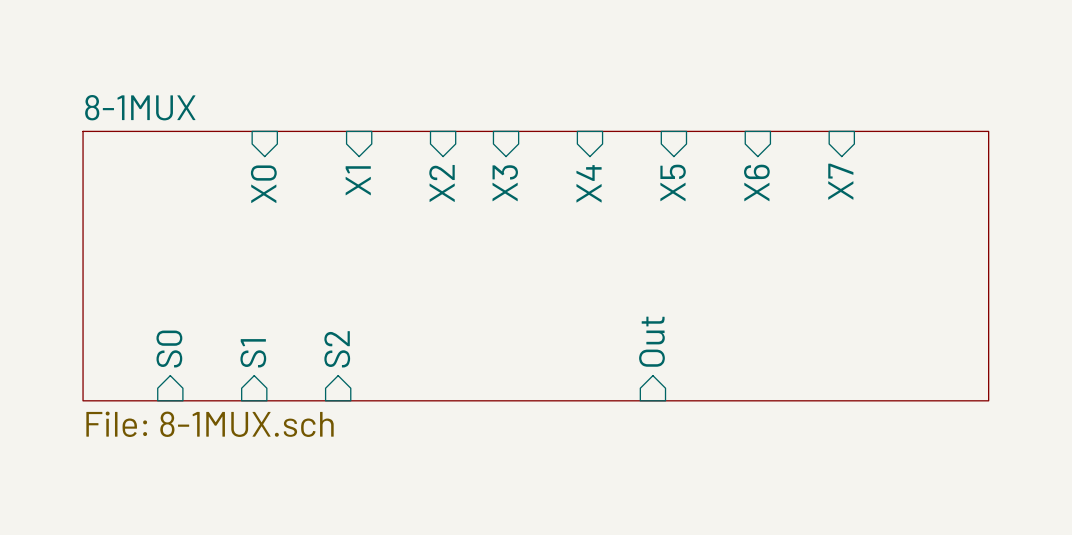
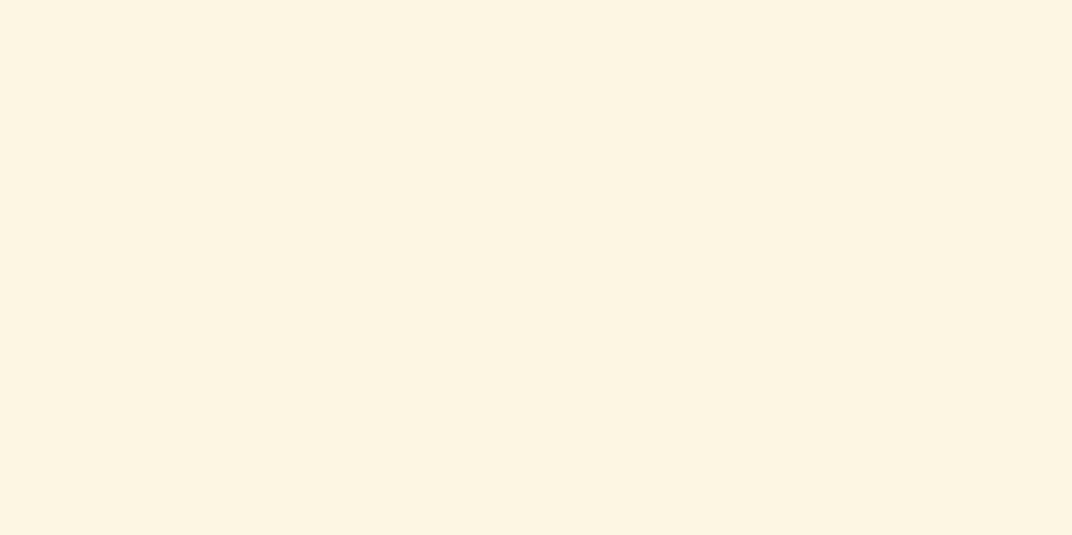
sheet pin: X1 (358, 180) -> none
sheet pin: X7 (840, 181) -> none
sheet pin: X5 (673, 182) -> none
sheet pin: X6 (756, 182) -> none
sheet pin: X2 (442, 183) -> none
sheet pin: X3 (505, 183) -> none
sheet pin: X4 (589, 183) -> none
sheet pin: X0 (263, 184) -> none
sheet 8-1MUX: File: 8-1MUX.sch (535, 266) -> none
sheet pin: Out (651, 341) -> none
sheet pin: S0 (169, 349) -> none
sheet pin: S2 (337, 349) -> none
sheet pin: S1 (253, 353) -> none

